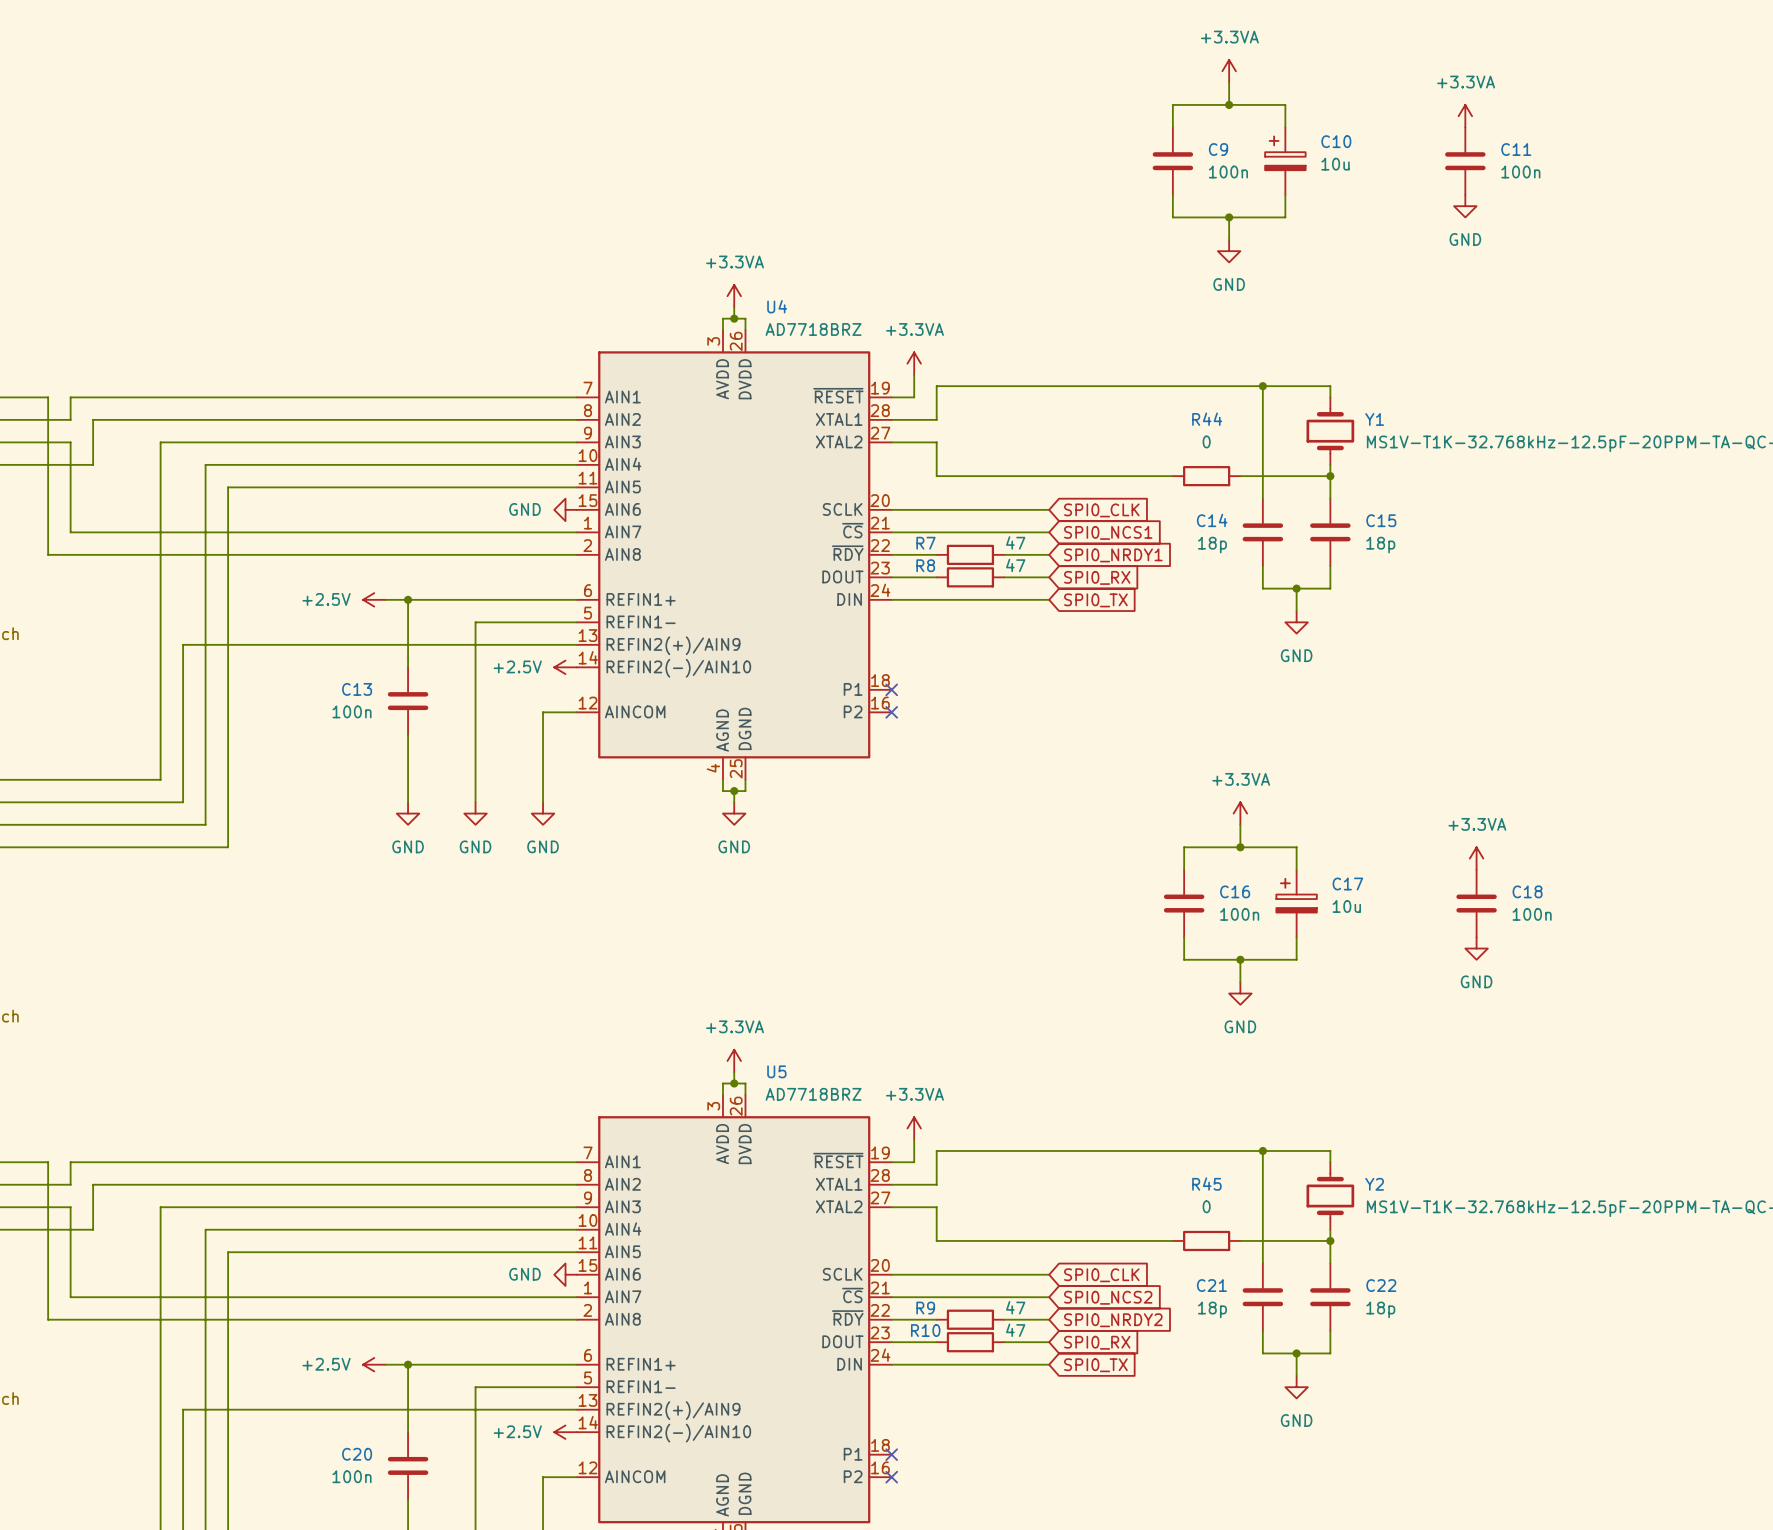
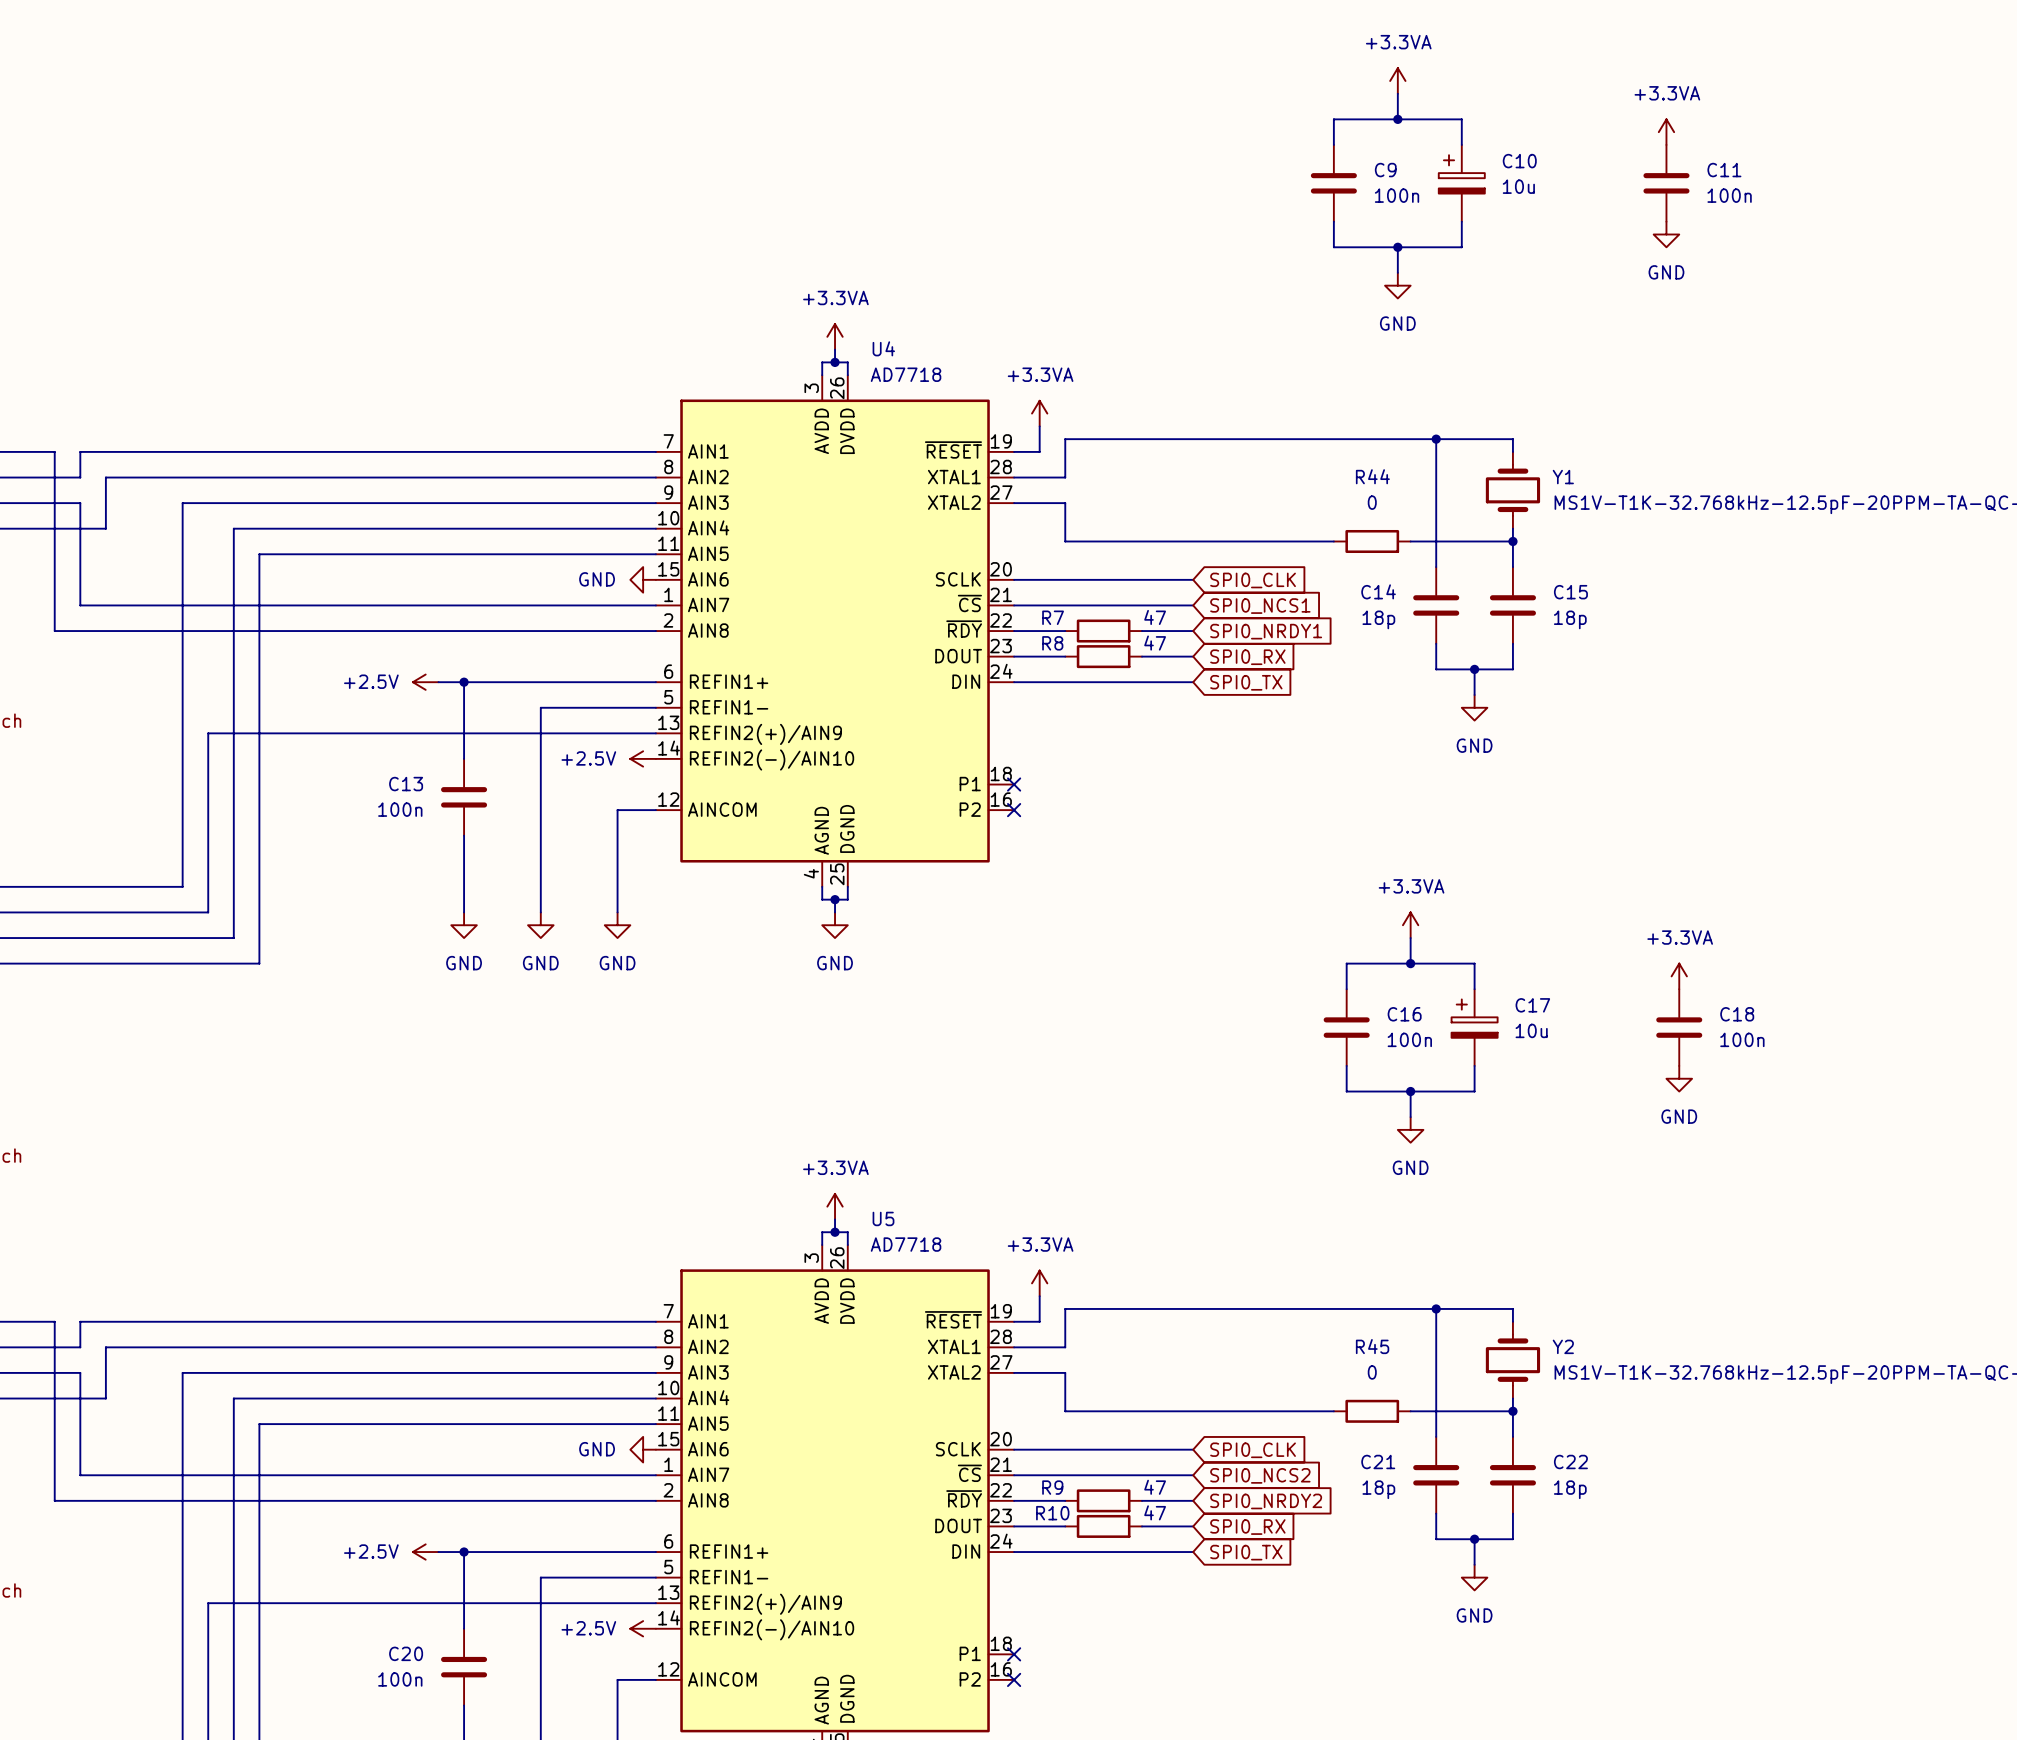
U4 value: AD7718BRZ (813, 329) -> AD7718 (906, 374)
U5 value: AD7718BRZ (813, 1094) -> AD7718 (906, 1244)

